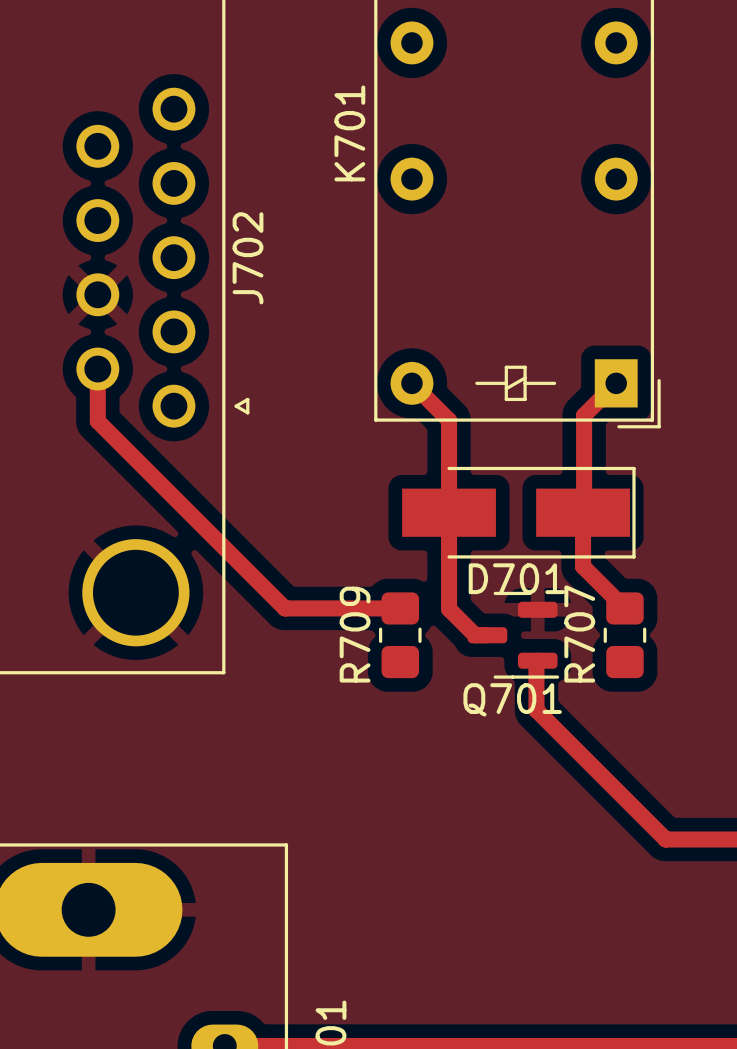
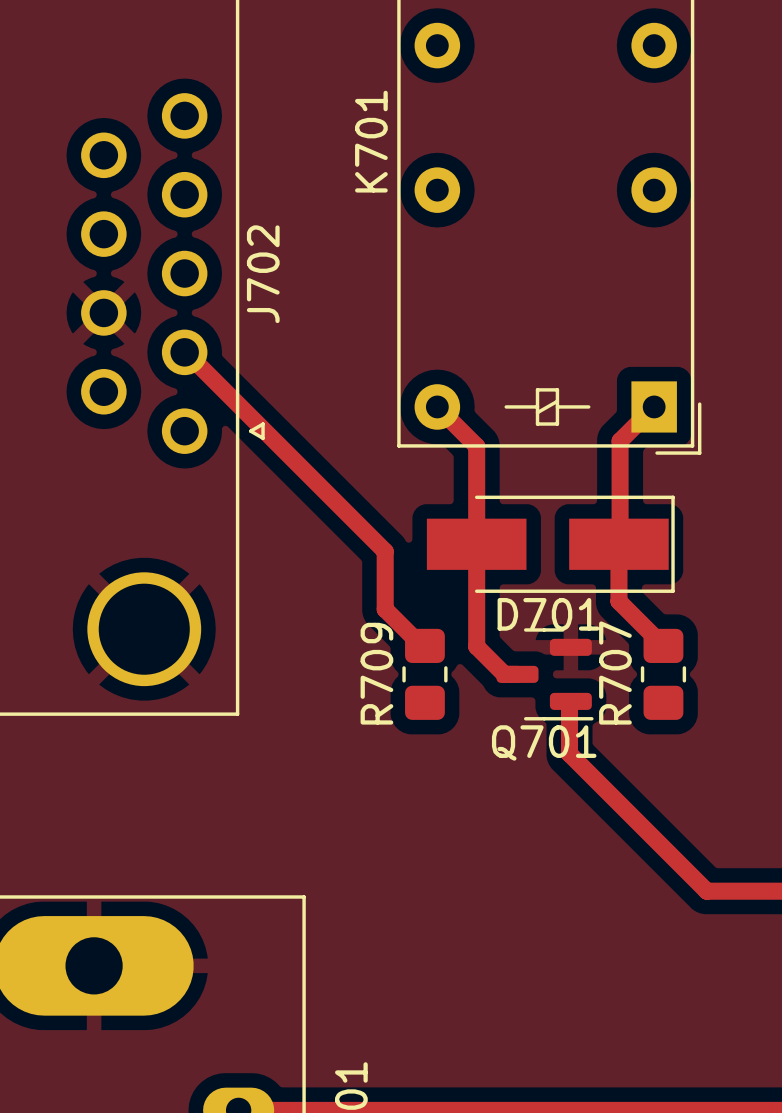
track: (97, 369) (97, 421) (284, 608) (397, 608) -> (184, 352) (385, 551) (385, 609) (421, 645)

